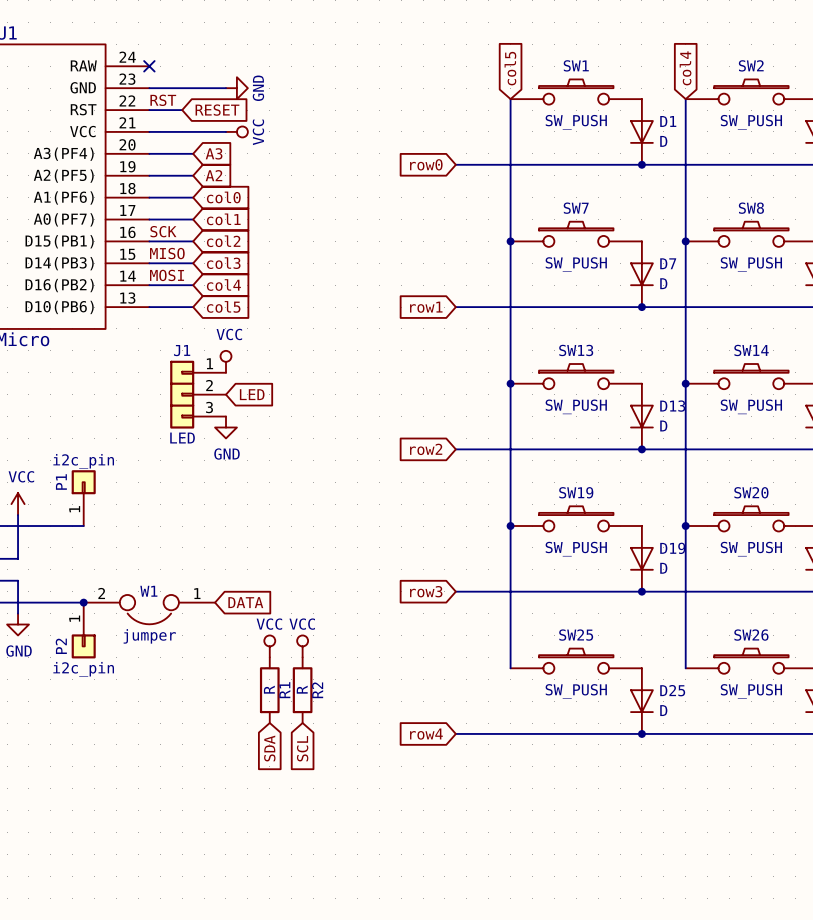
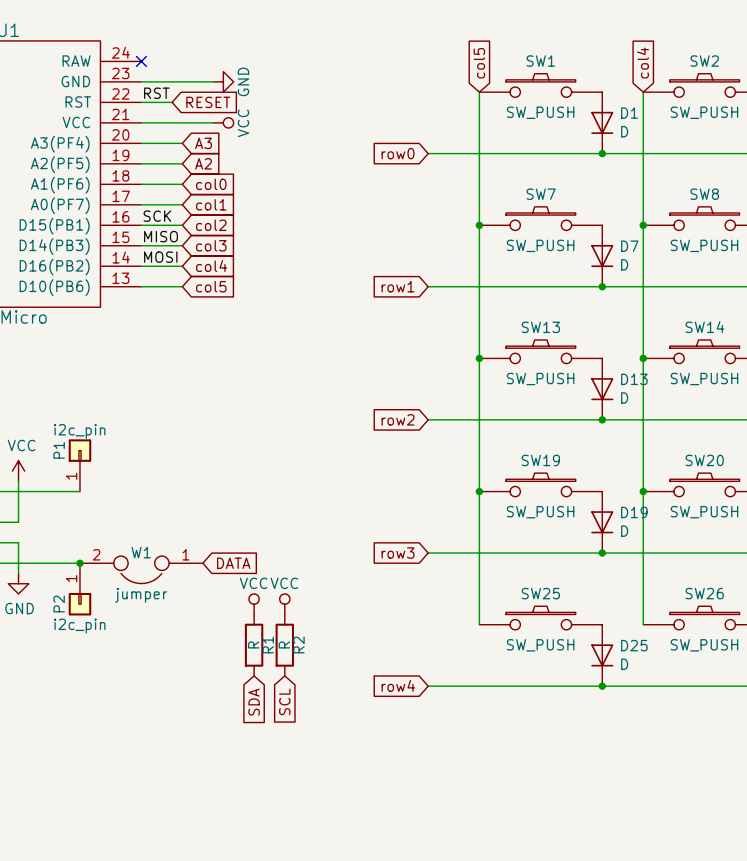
power symbol: VCC (225, 361) -> none
J1: LED (198, 394) -> none
global label: LED (252, 394) -> none
power symbol: GND (225, 427) -> none

